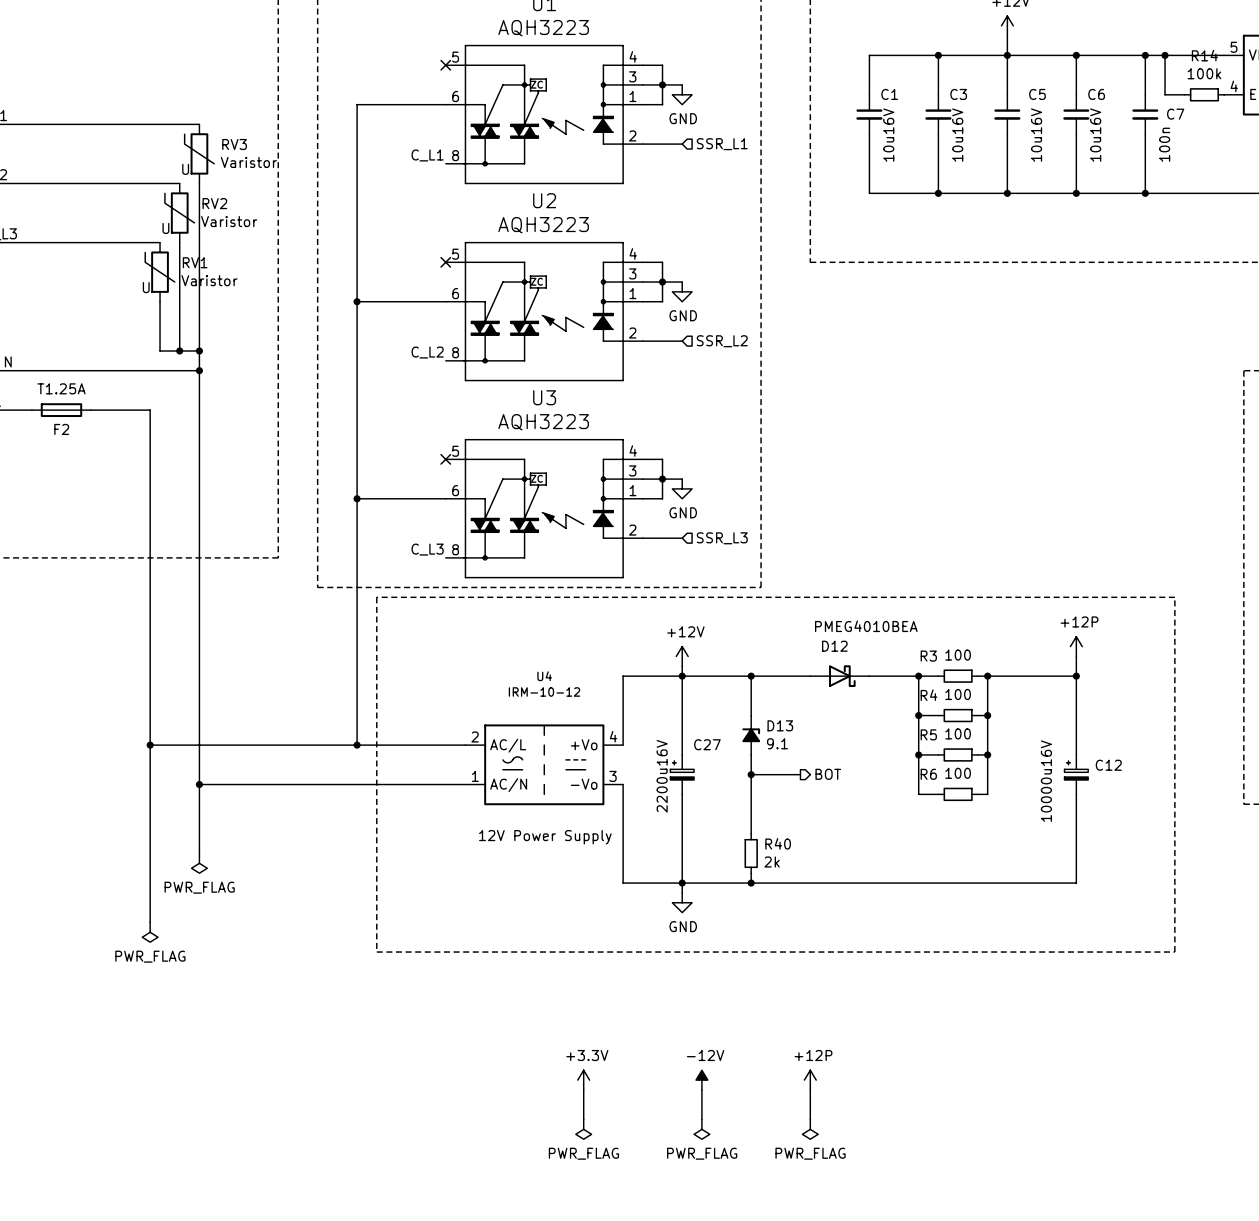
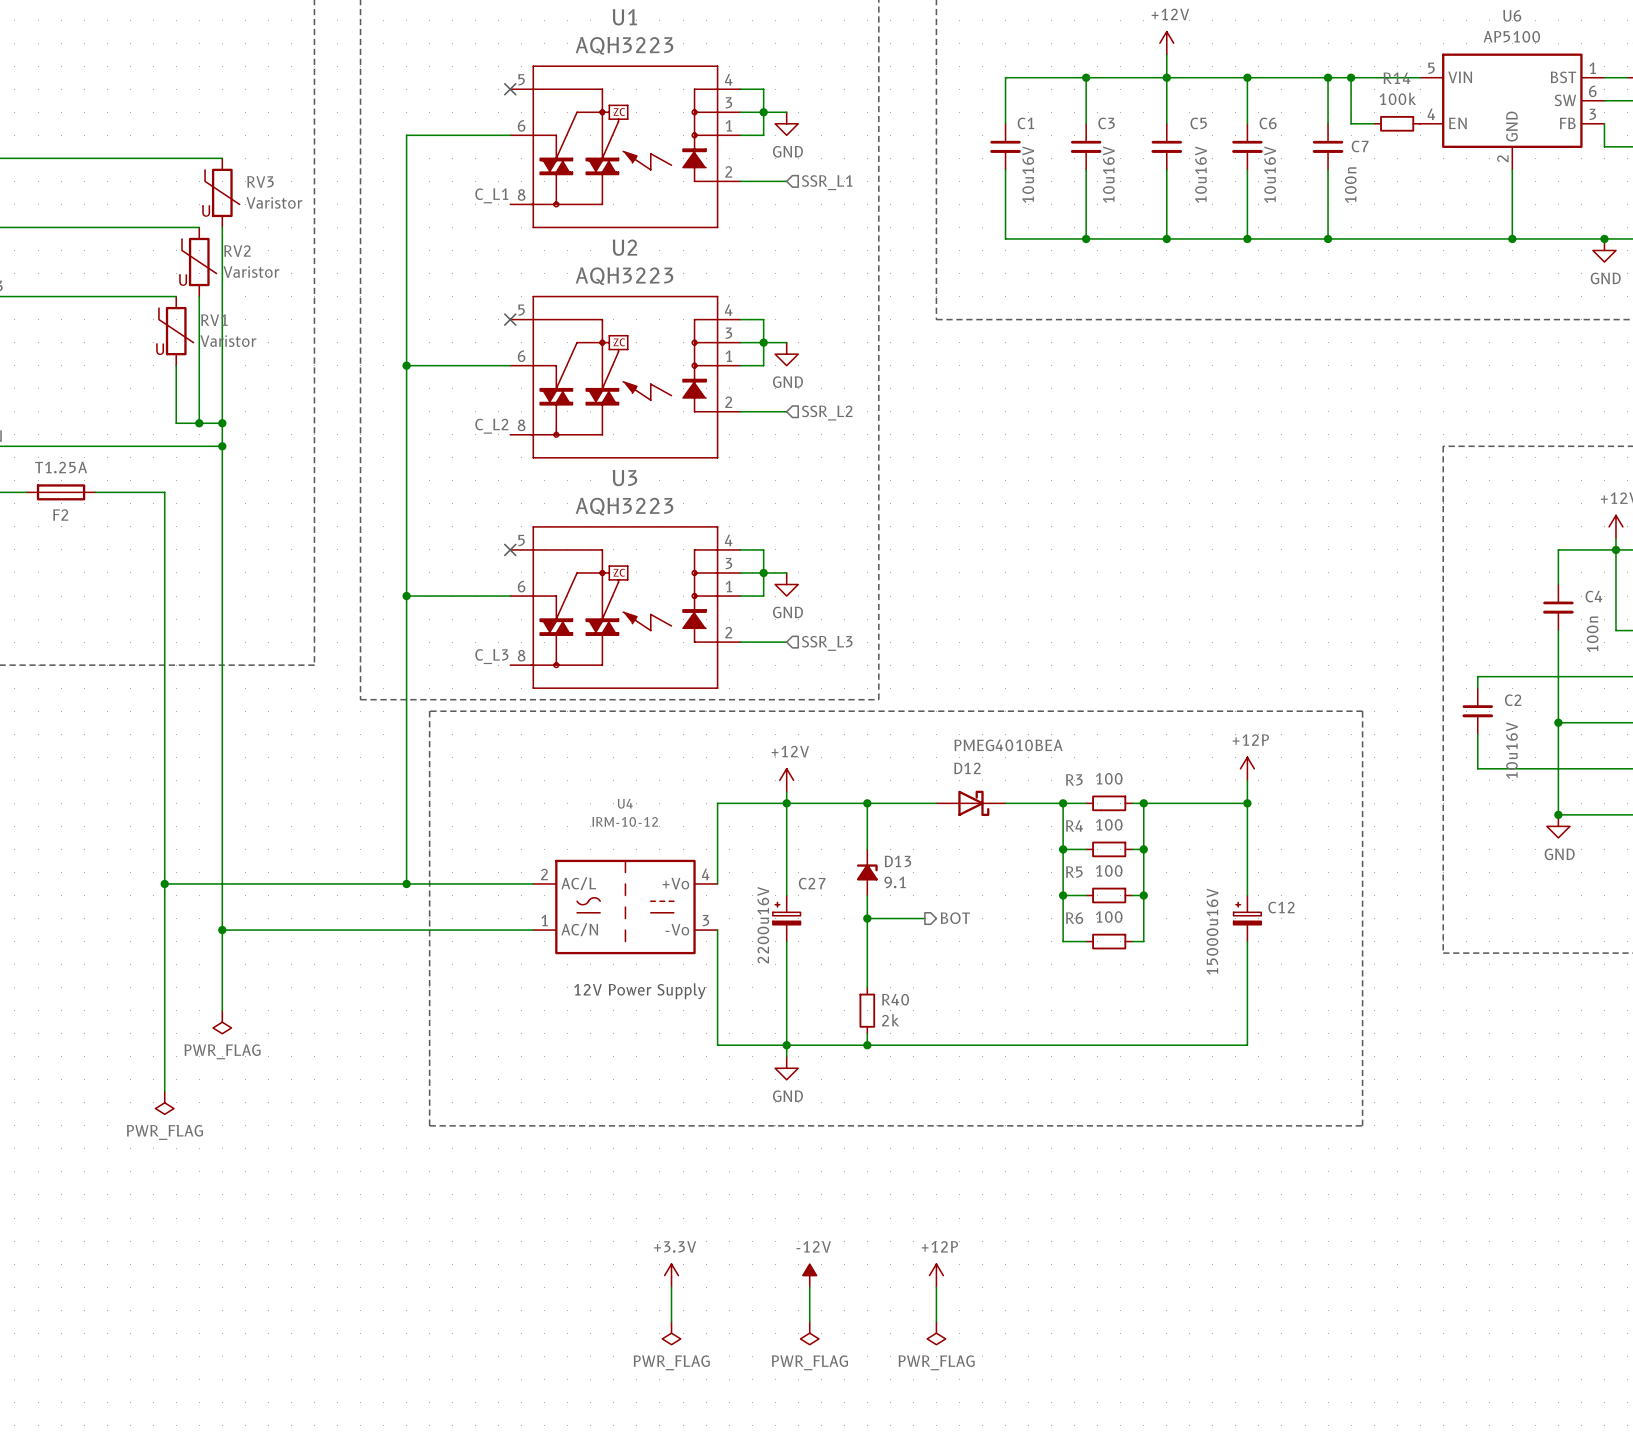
C12 value: 10000u16V (1046, 781) -> 15000u16V (1212, 931)

